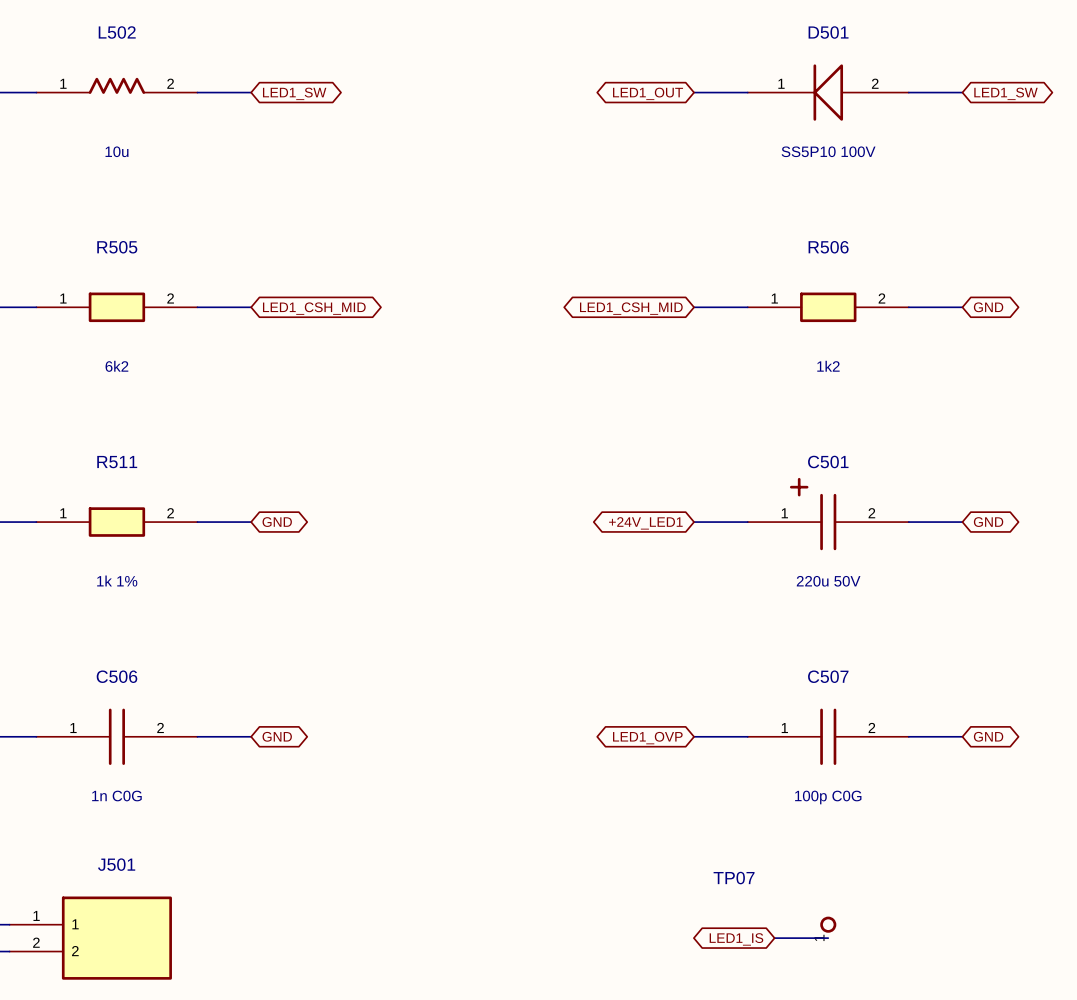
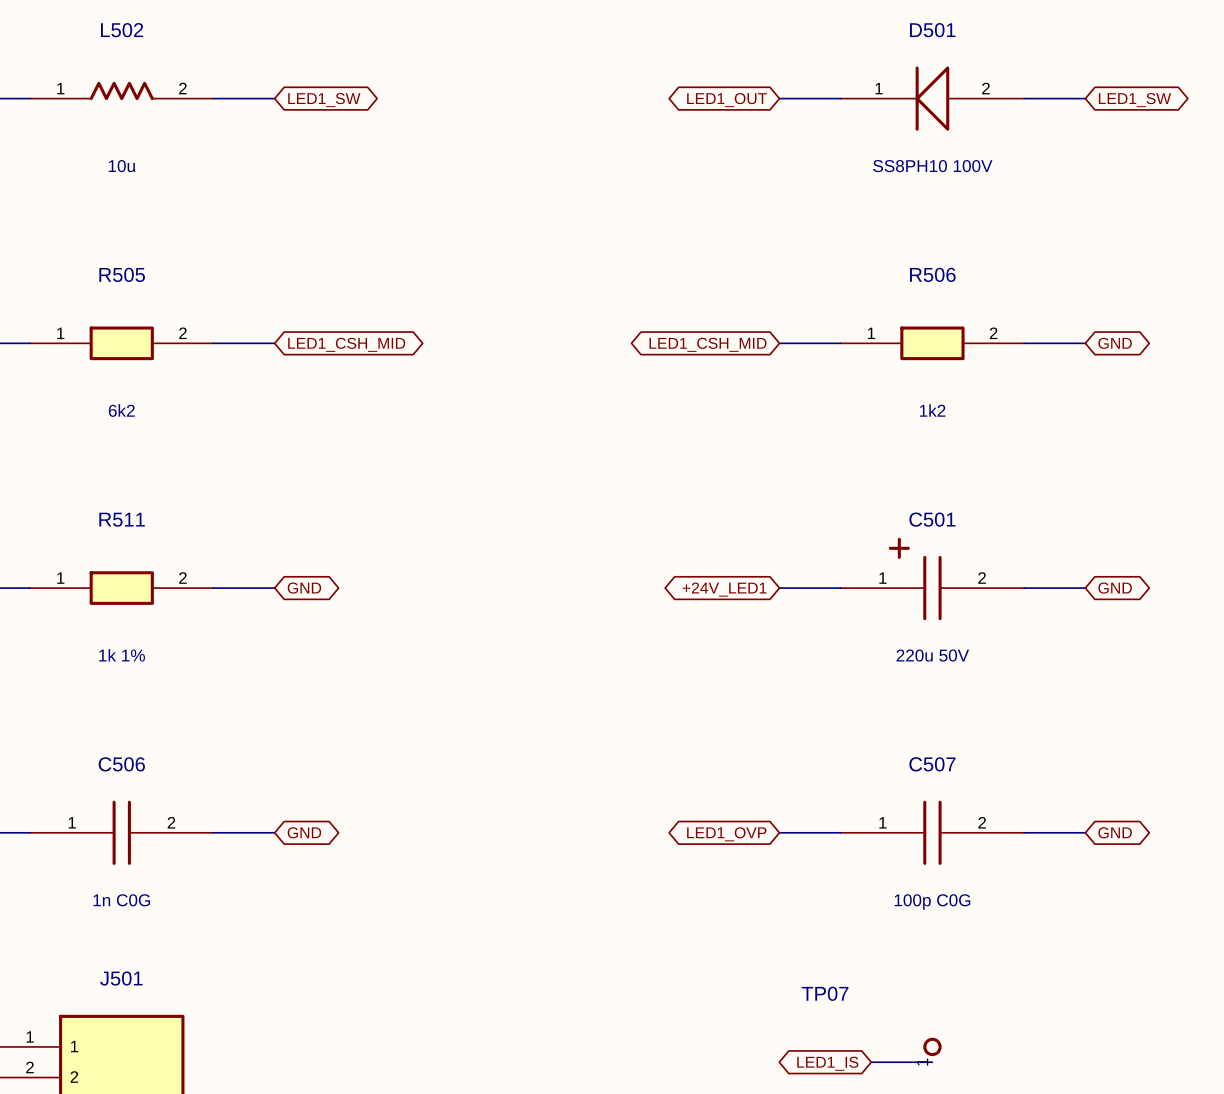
D501 value: SS5P10 100V (828, 151) -> SS8PH10 100V (932, 166)

